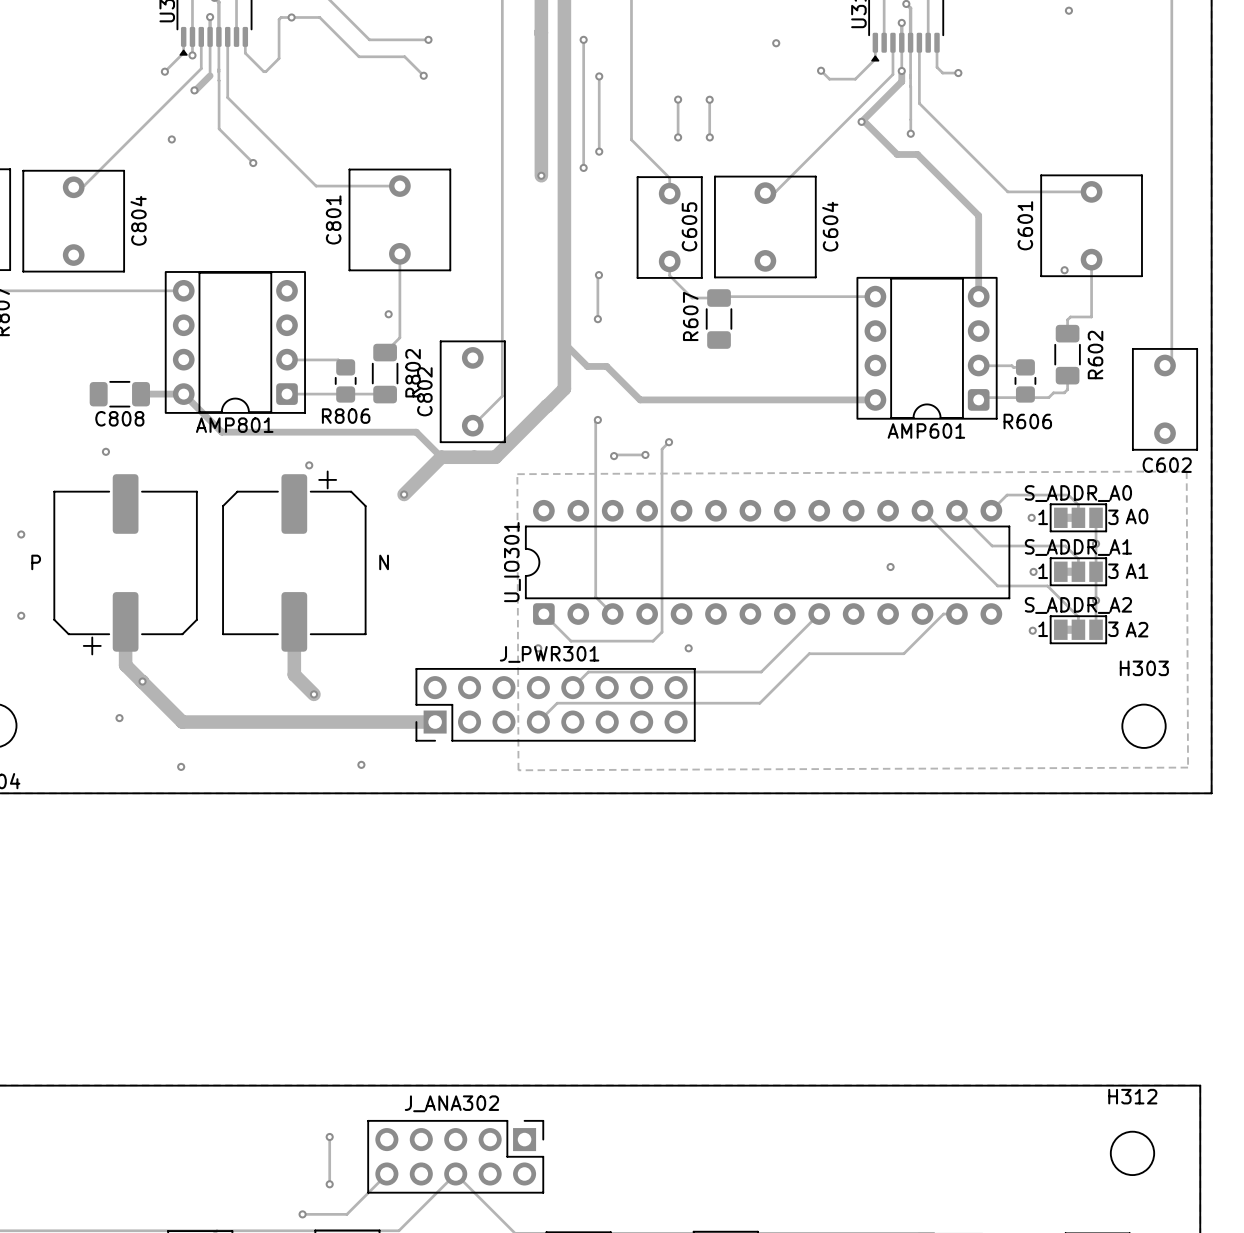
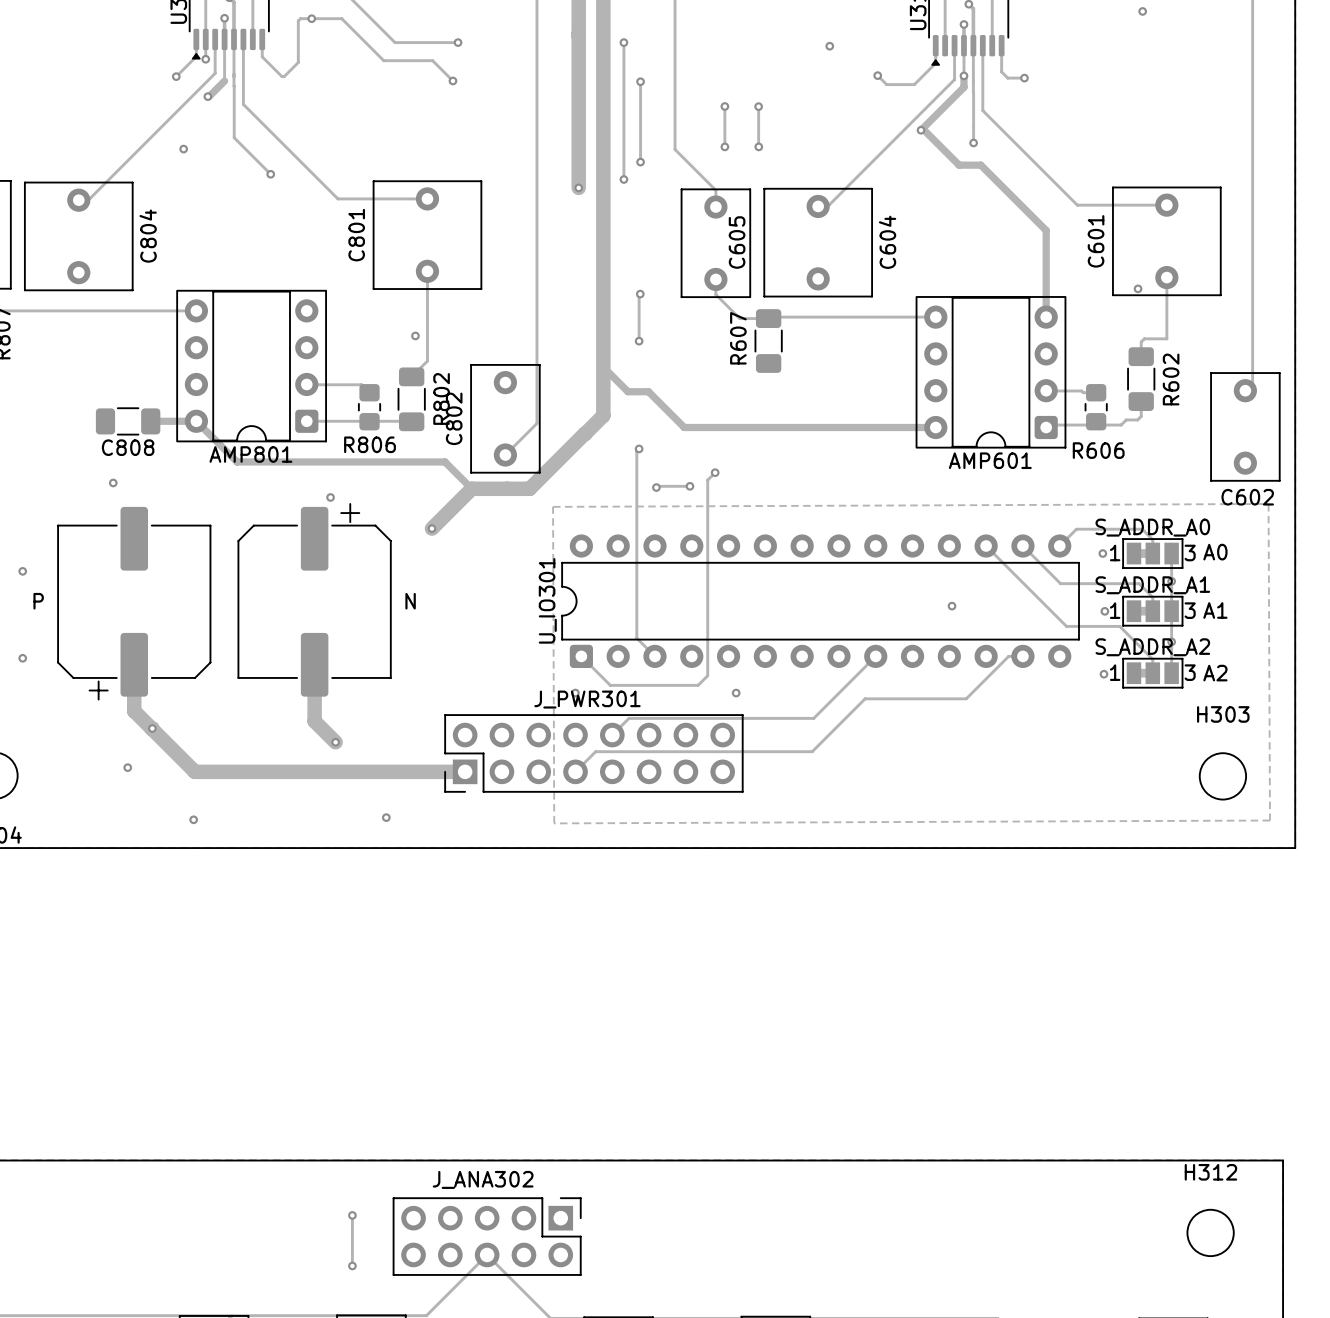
track: (386, 1173) (346, 1214) (302, 1214) -> none
via: (302, 1214) -> none

